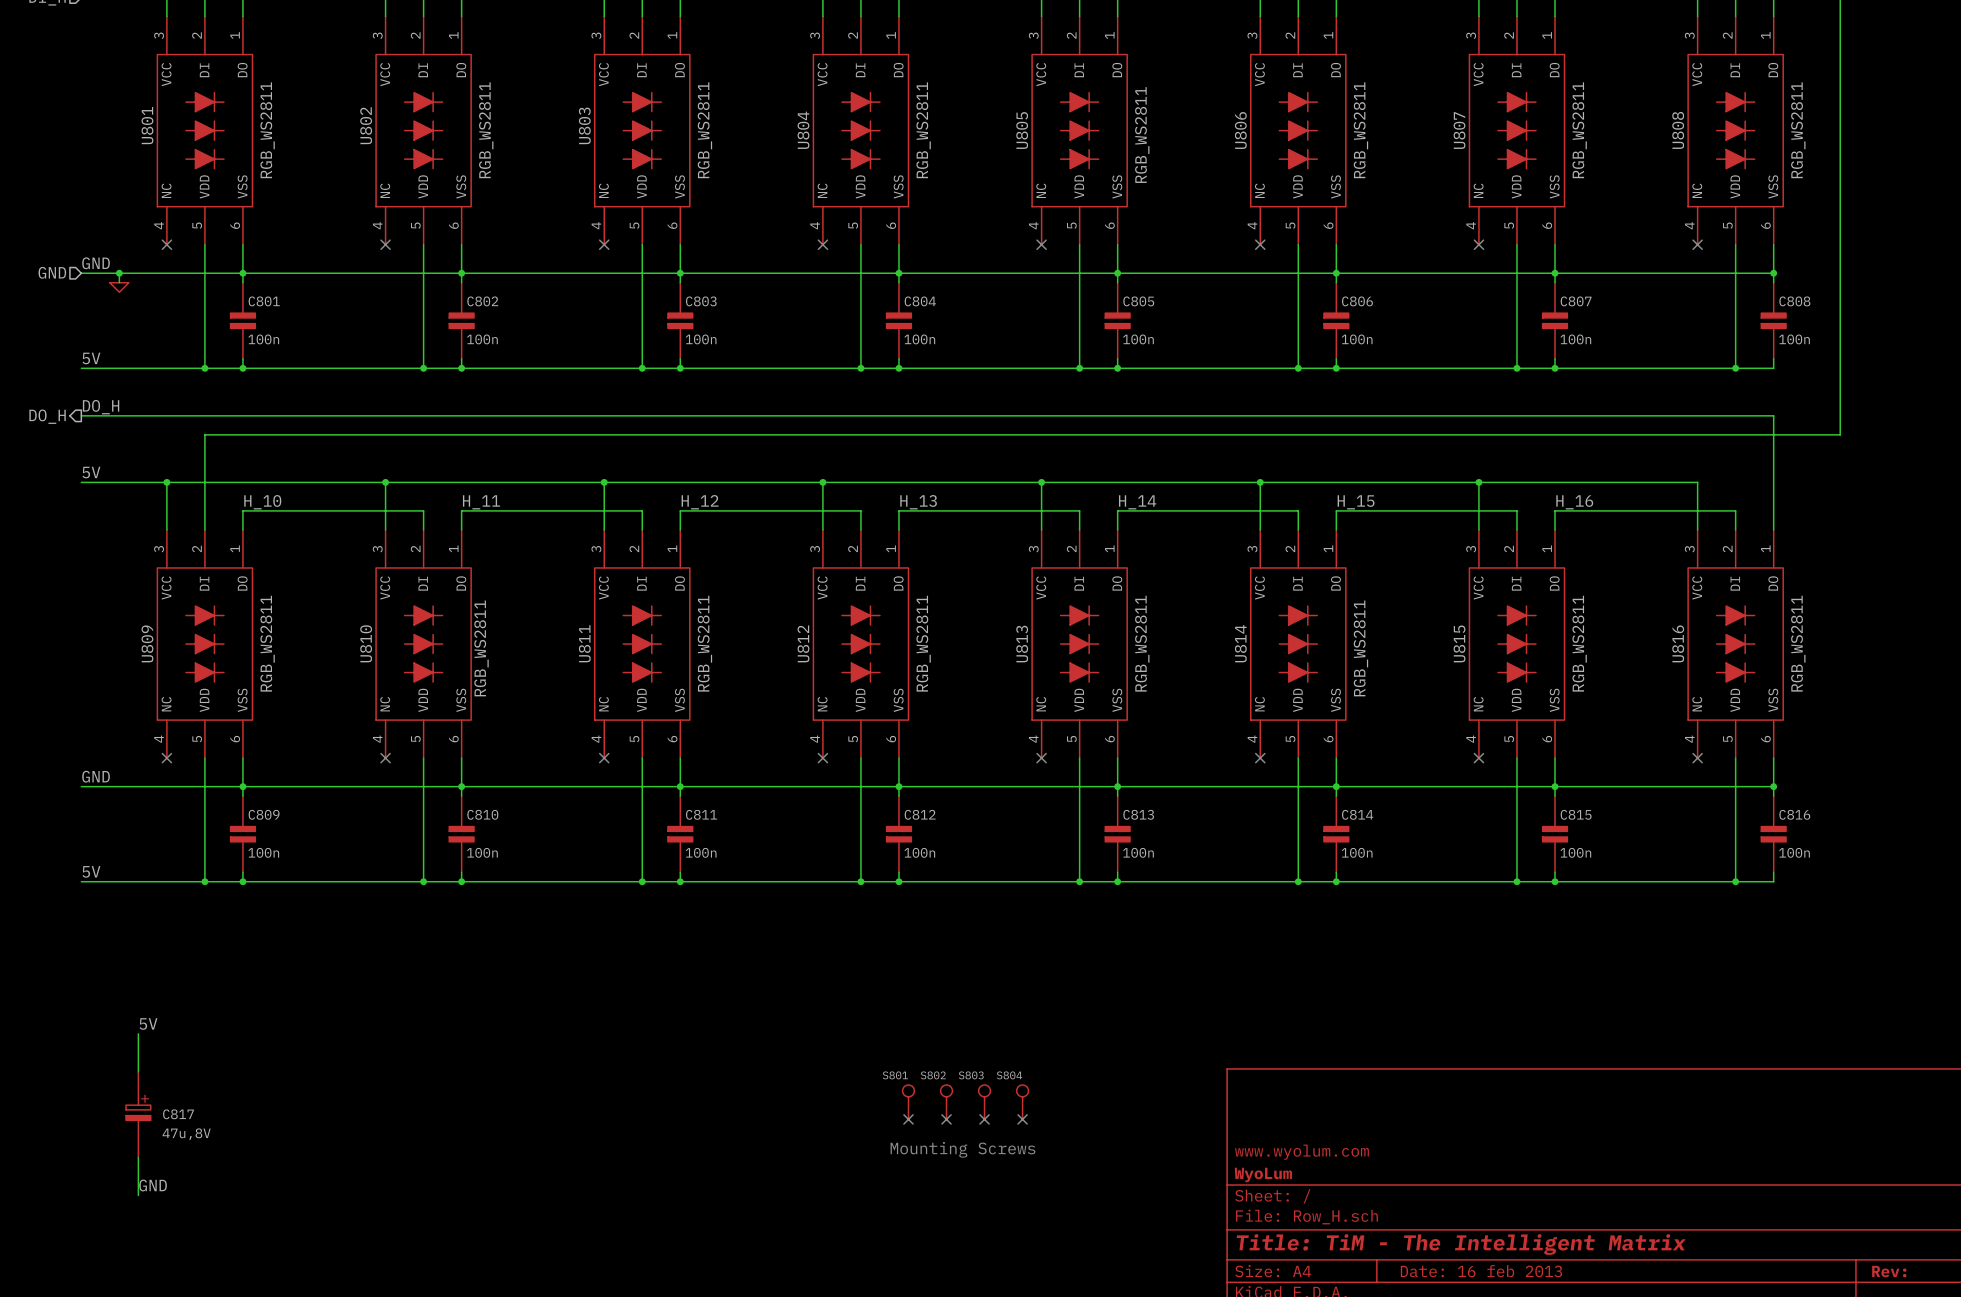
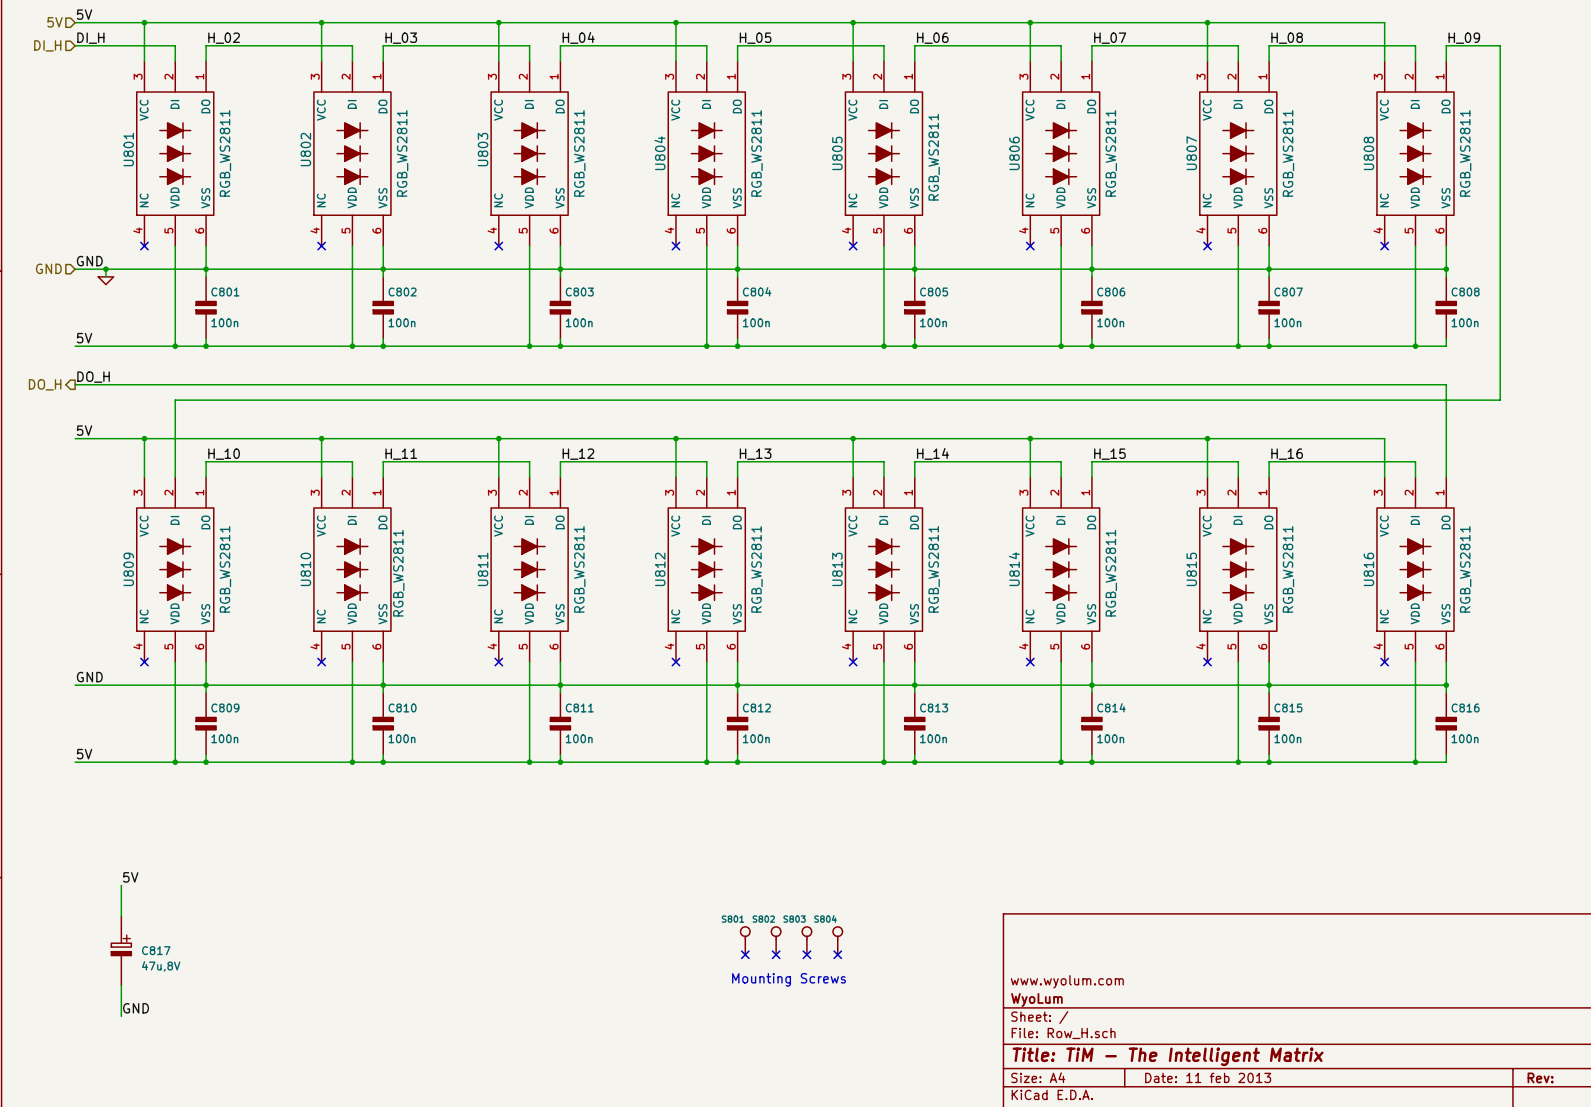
title block: Date: 16 feb 2013 (1481, 1271) -> Date: 11 feb 2013 (1208, 1077)

